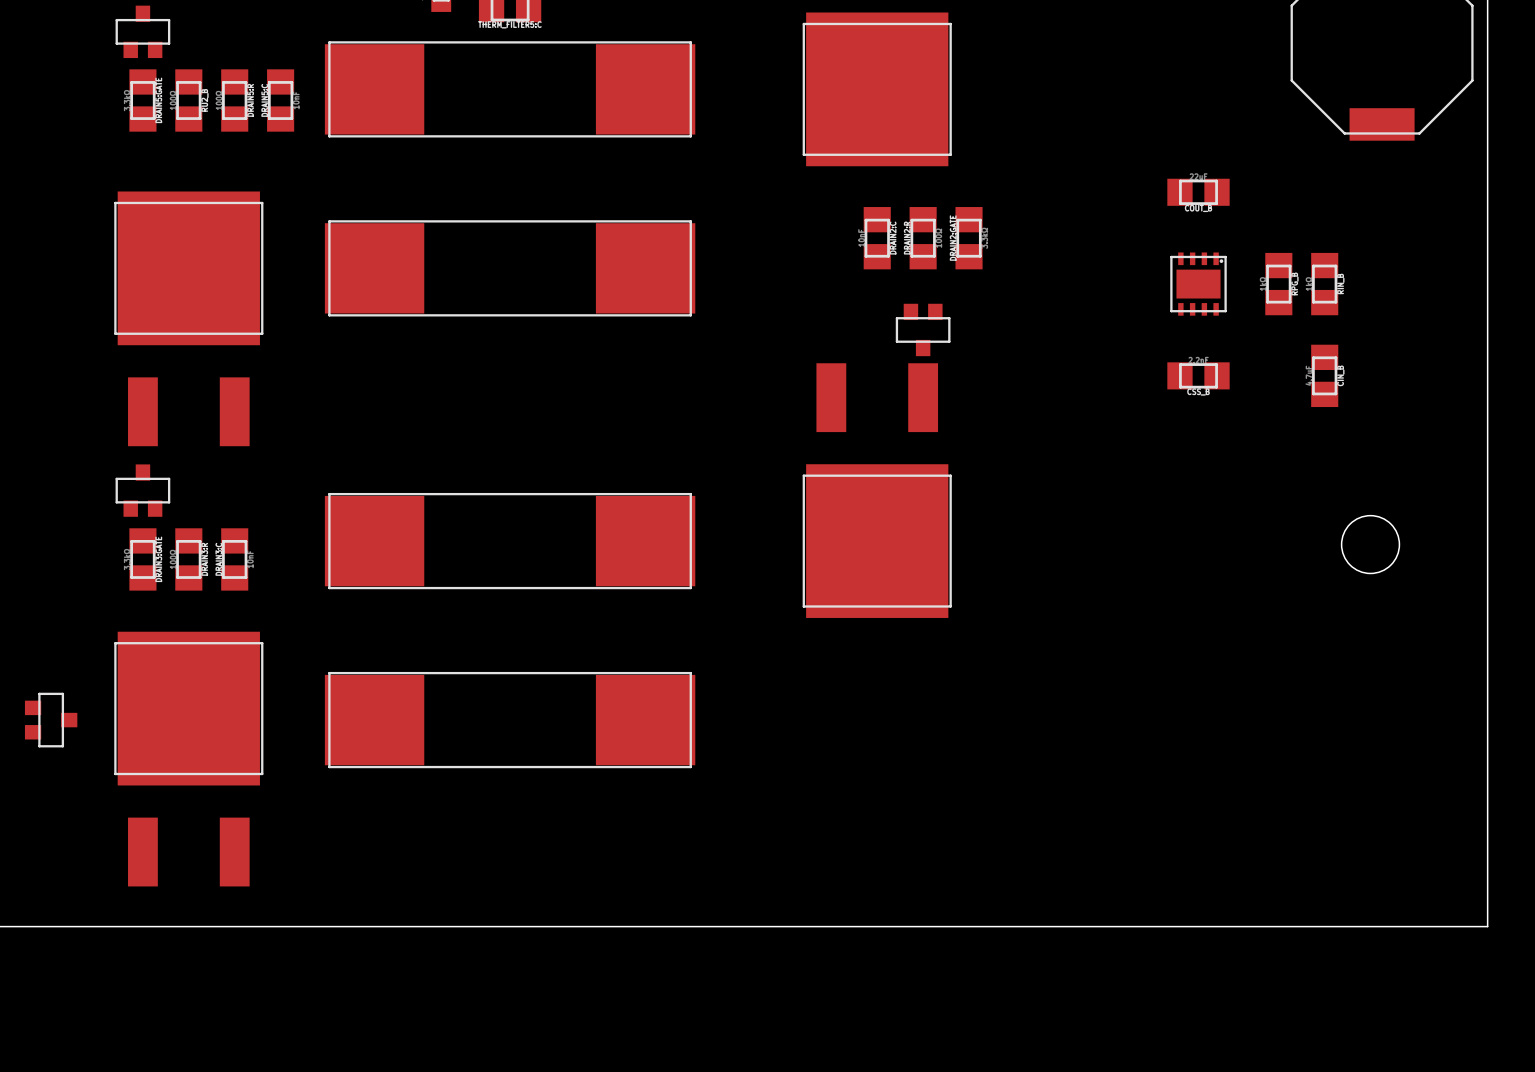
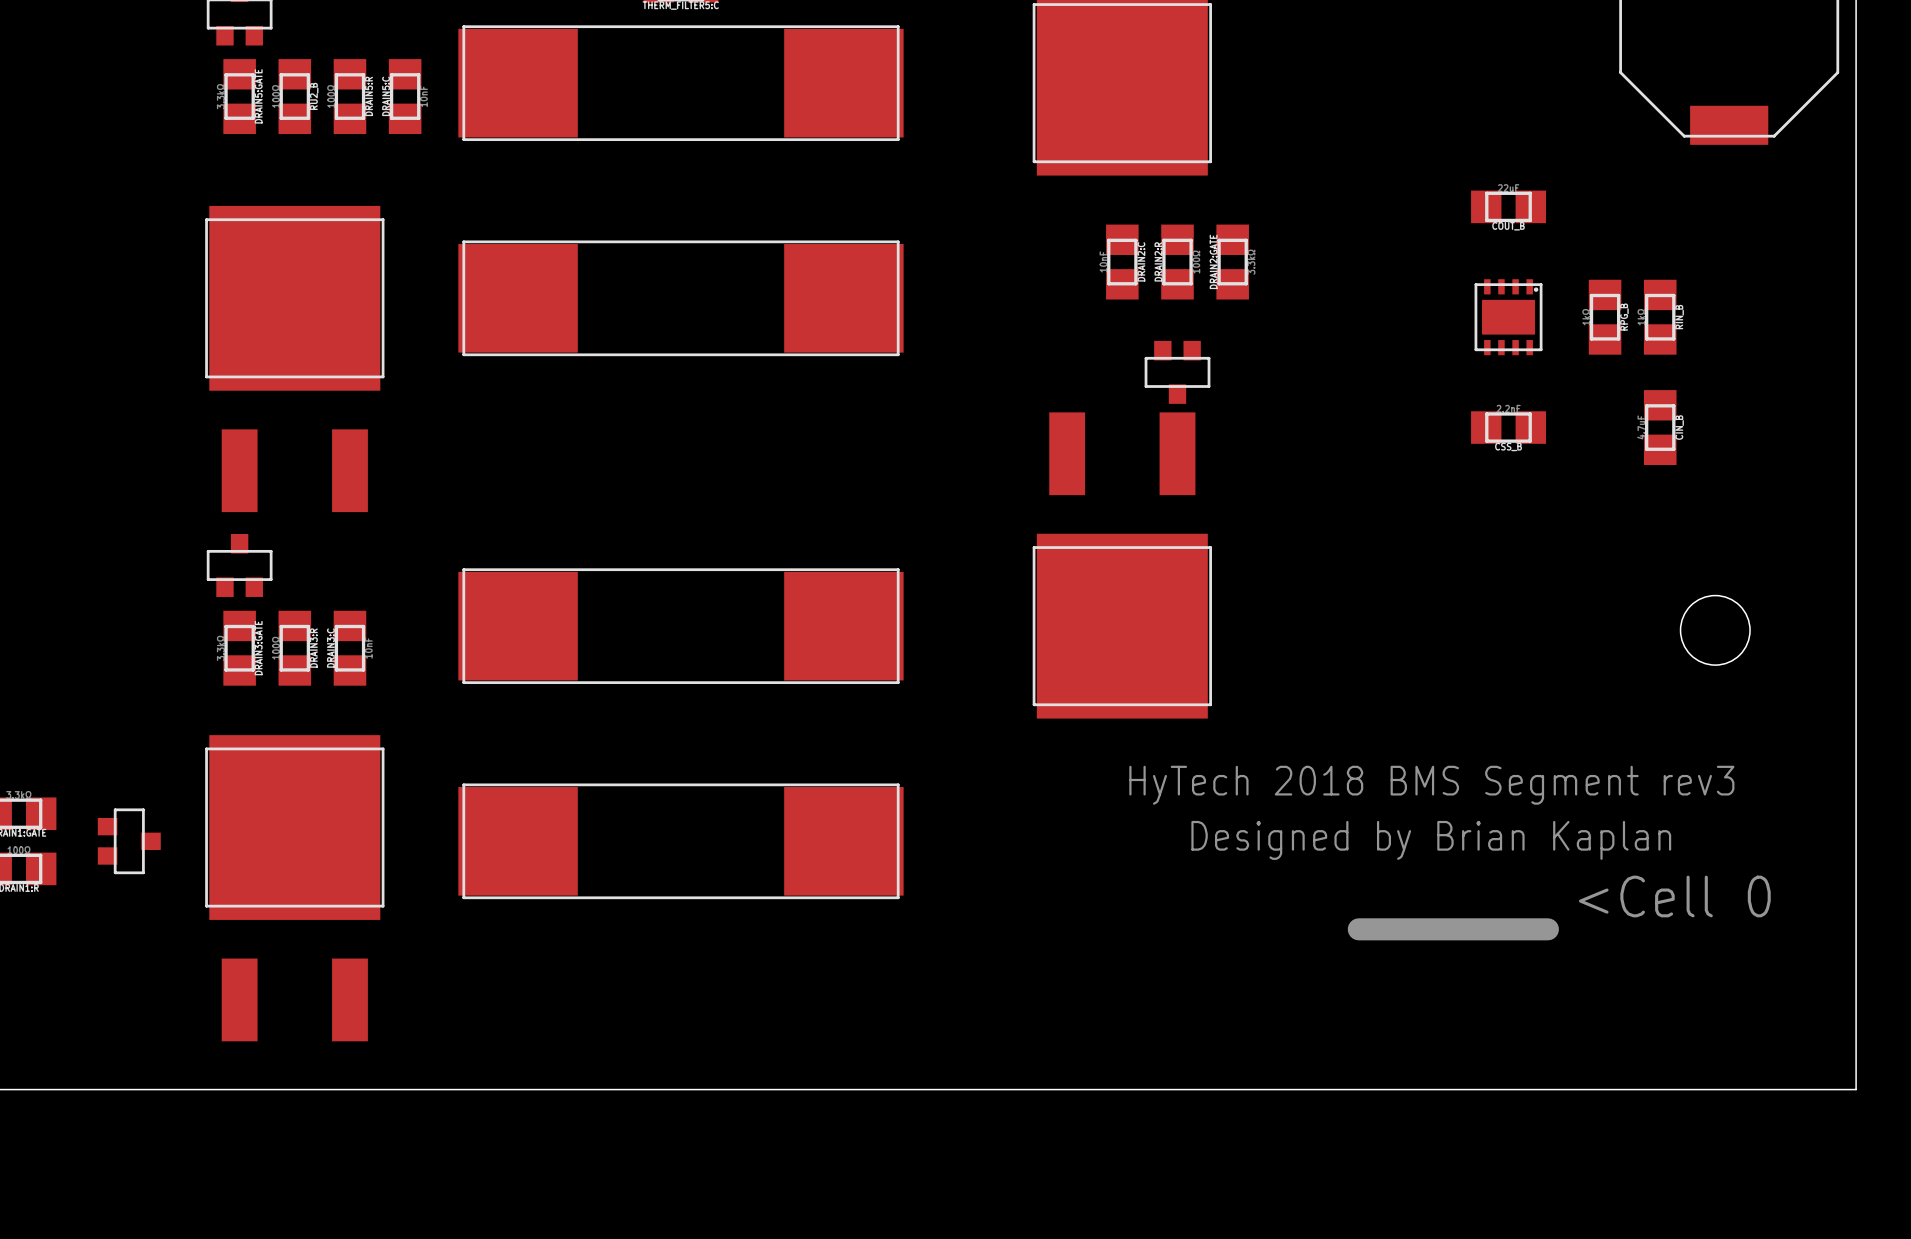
text: none -> HyTech 2018 BMS Segment rev3 (1431, 785)
text: none -> Designed by Brian Kaplan (1431, 840)
text: none -> <Cell 0 (1674, 896)
text: none -> - (1453, 929)

